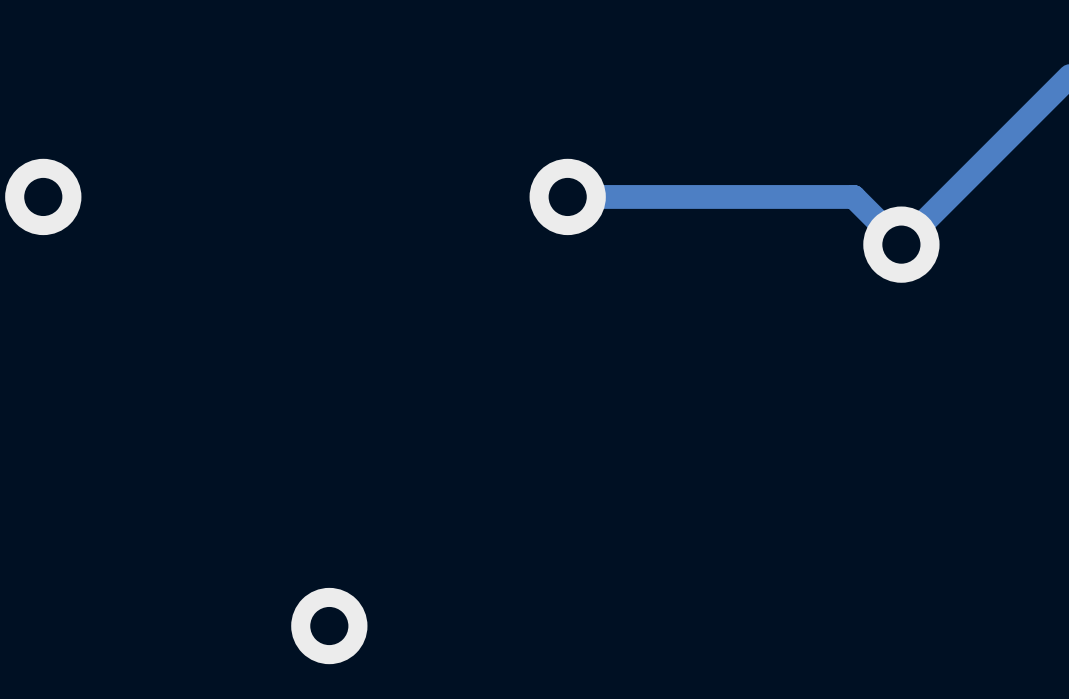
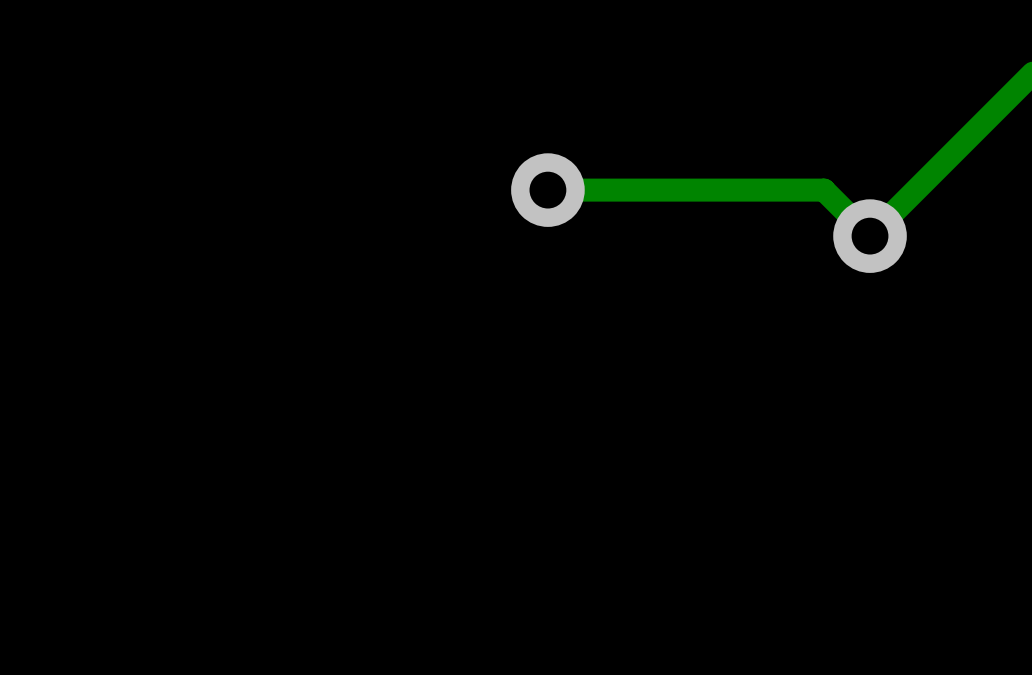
via: (43, 196) -> none
via: (329, 626) -> none

